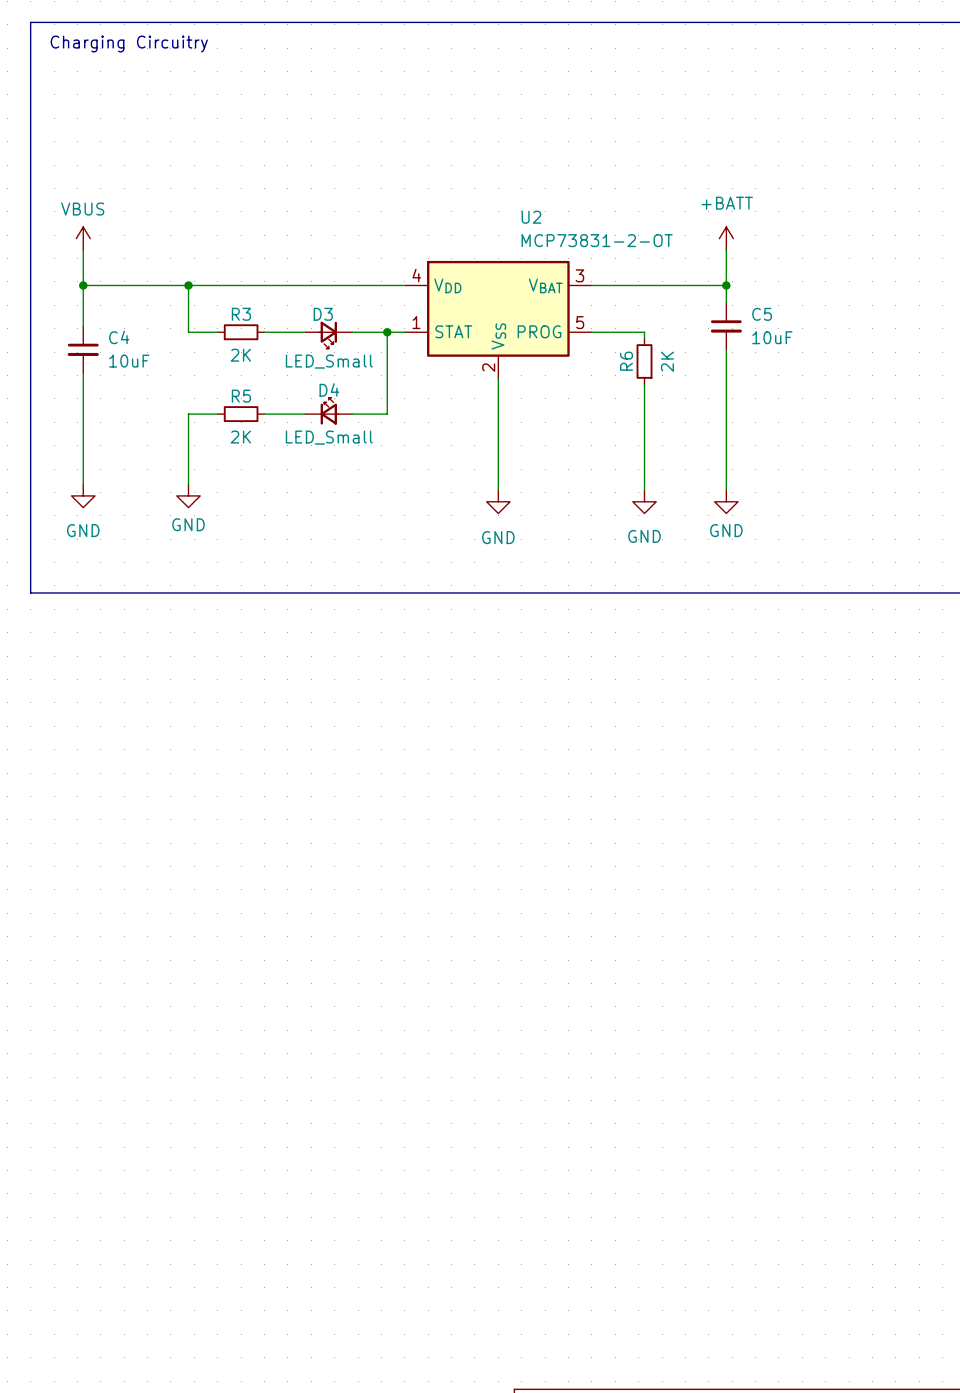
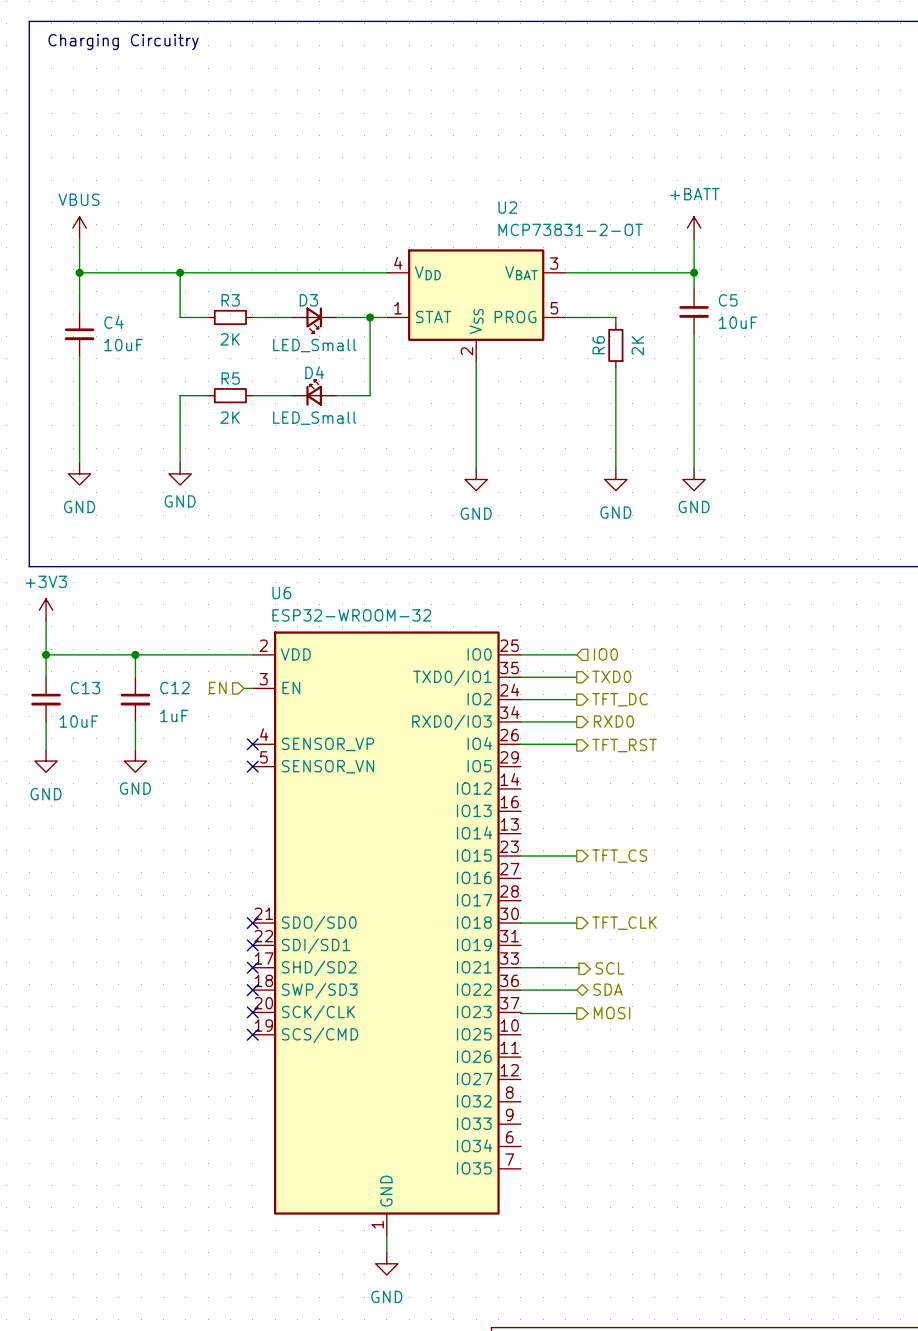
power symbol: none -> +3V3 (46, 610)
wire: none -> (46, 621) (46, 677)
hierarchical label: none -> IO0 (605, 654)
wire: none -> (46, 654) (252, 654)
junction: none -> (46, 654)
wire: none -> (135, 654) (135, 677)
junction: none -> (135, 654)
wire: none -> (520, 654) (576, 654)
wire: none -> (520, 677) (576, 677)
hierarchical label: none -> TXD0 (611, 676)
hierarchical label: none -> EN (217, 687)
wire: none -> (243, 688) (252, 688)
C13: none -> 10uF (46, 699)
C12: none -> 1uF (135, 699)
wire: none -> (520, 699) (576, 699)
hierarchical label: none -> TFT_DC (620, 699)
wire: none -> (46, 721) (46, 749)
wire: none -> (135, 721) (135, 749)
wire: none -> (520, 721) (576, 721)
hierarchical label: none -> RXD0 (613, 721)
no-connect mark: none -> (252, 744)
wire: none -> (520, 744) (576, 745)
hierarchical label: none -> TFT_RST (624, 745)
power symbol: none -> GND (46, 761)
power symbol: none -> GND (135, 761)
no-connect mark: none -> (252, 766)
wire: none -> (520, 856) (576, 856)
hierarchical label: none -> TFT_CS (619, 856)
no-connect mark: none -> (252, 923)
wire: none -> (520, 923) (576, 923)
hierarchical label: none -> TFT_CLK (624, 923)
U6: none -> ESP32-WROOM-32 (386, 933)
no-connect mark: none -> (252, 945)
no-connect mark: none -> (252, 967)
wire: none -> (520, 967) (578, 968)
hierarchical label: none -> SCL (610, 968)
hierarchical label: none -> SDA (608, 989)
no-connect mark: none -> (252, 990)
wire: none -> (520, 990) (576, 990)
no-connect mark: none -> (252, 1012)
wire: none -> (520, 1012) (576, 1013)
hierarchical label: none -> MOSI (612, 1013)
no-connect mark: none -> (252, 1034)
wire: none -> (386, 1235) (386, 1252)
power symbol: none -> GND (386, 1263)

